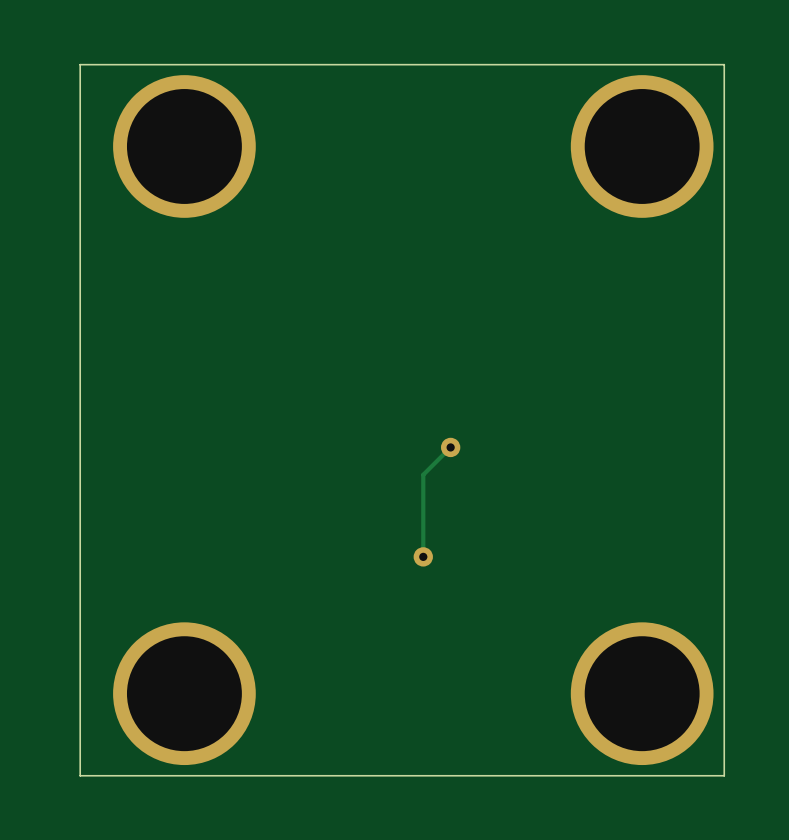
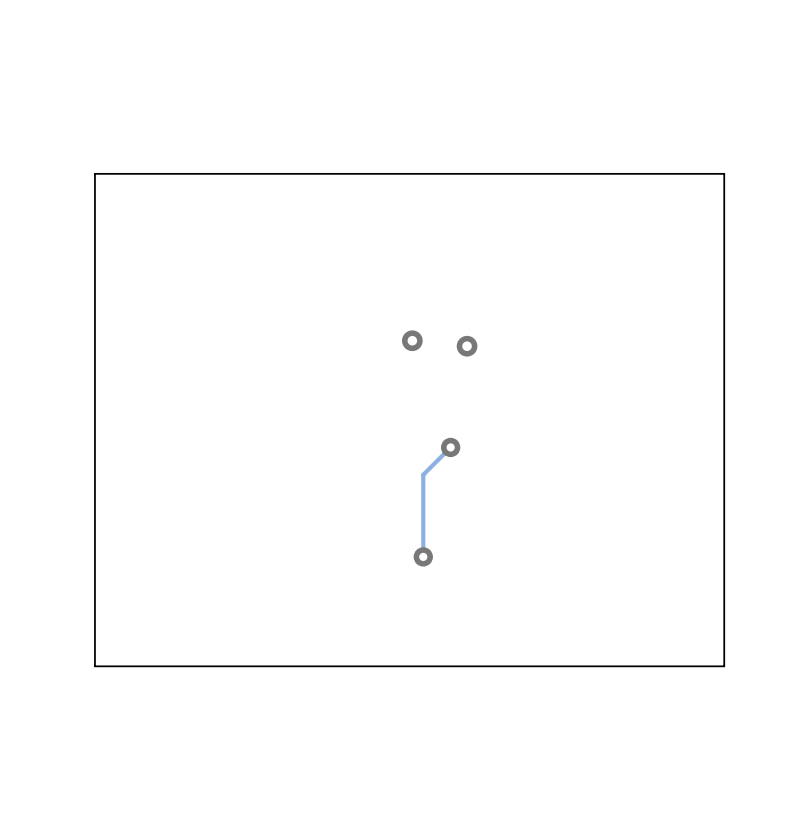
via: (184, 146) -> none
via: (642, 146) -> none
board edge: (724, 173) (724, 64) (80, 64) (80, 775) (724, 775) (724, 666) -> (724, 173) (94, 173) (94, 666) (724, 666)
via: none -> (412, 340)
via: none -> (467, 346)
via: (184, 693) -> none
via: (642, 693) -> none

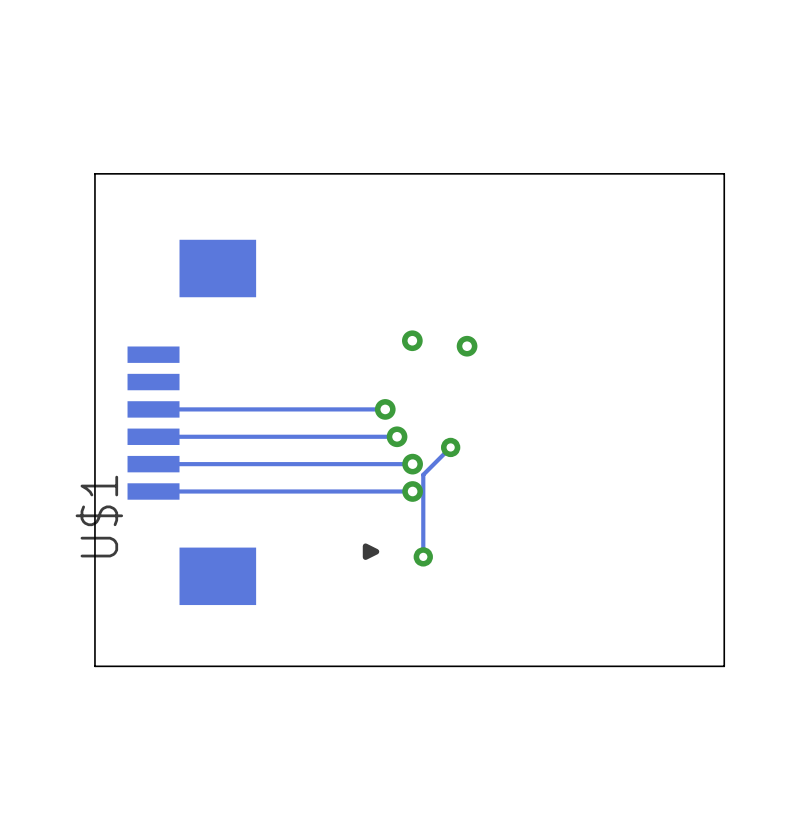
track: none -> (385, 409) (153, 409)
via: none -> (385, 409)
U$1: none -> (253, 422)
track: none -> (397, 436) (153, 436)
via: none -> (397, 436)
track: none -> (412, 464) (153, 464)
via: none -> (412, 464)
track: none -> (412, 491) (153, 491)
via: none -> (412, 491)

